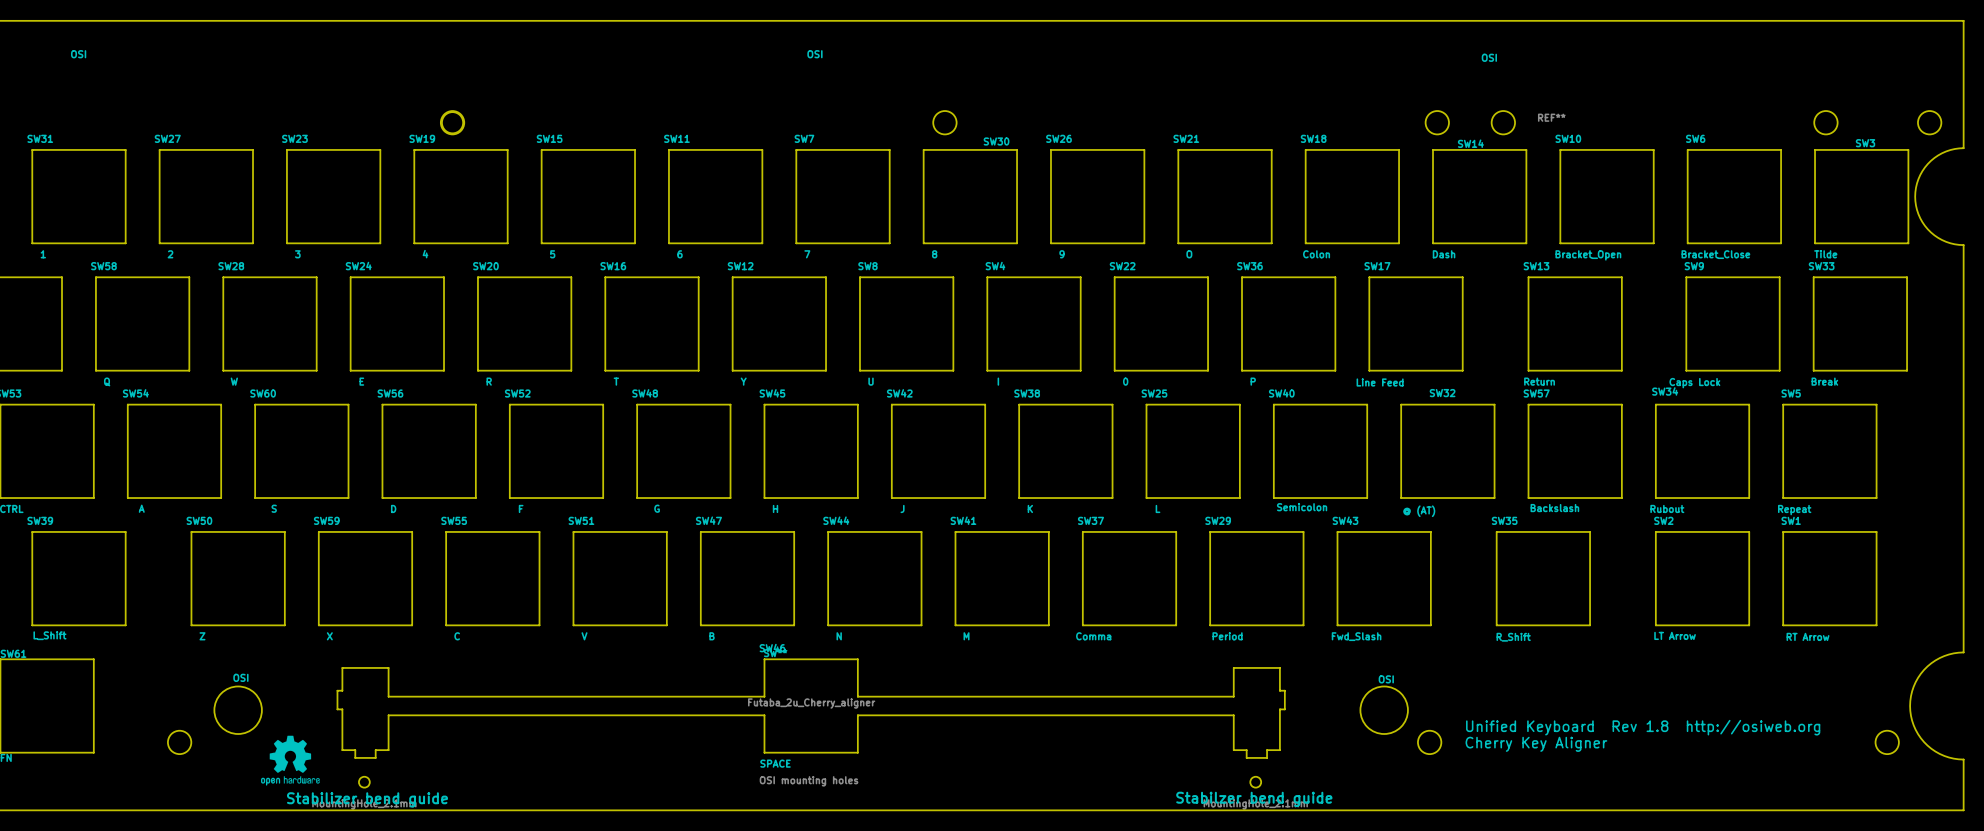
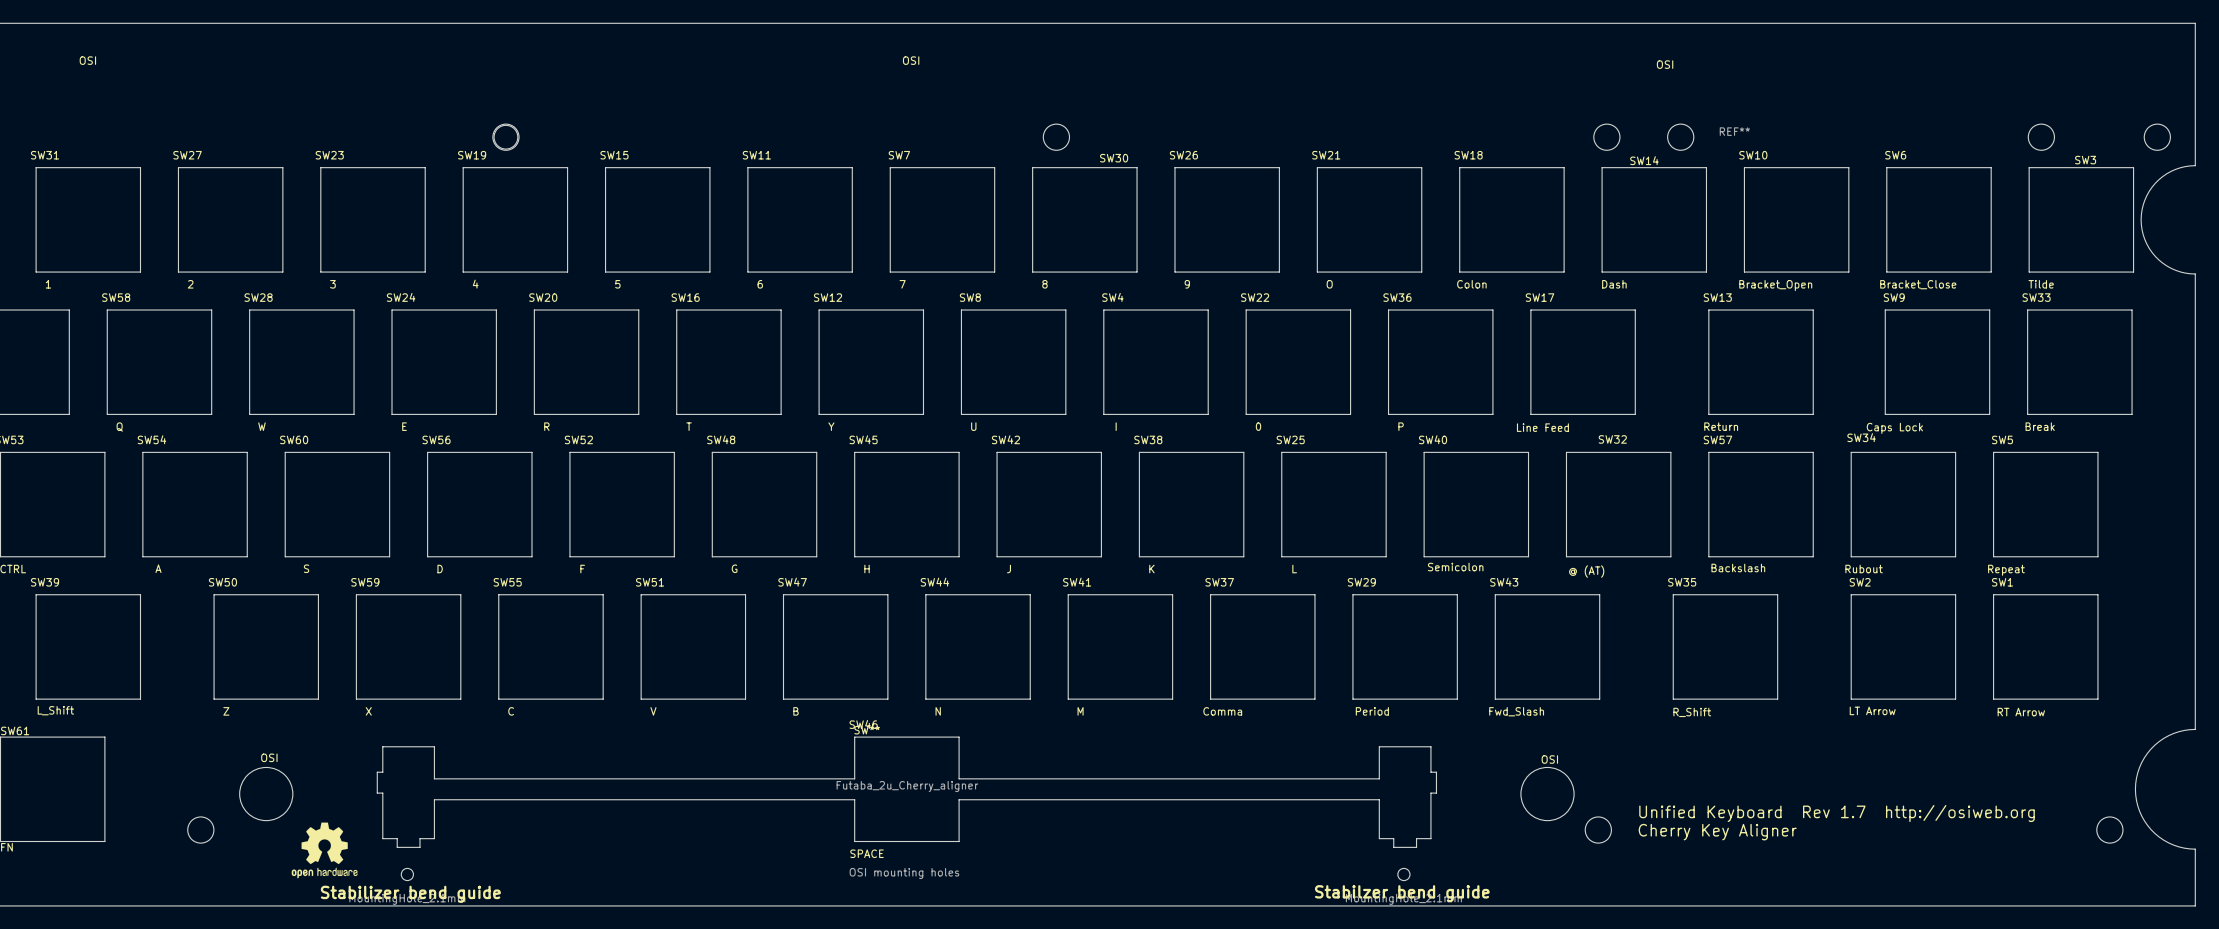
text: Unified Keyboard Rev 1.8 http://osiweb.org (1643, 727) -> Unified Keyboard Rev 1.7 http://osiweb.org (1837, 813)

